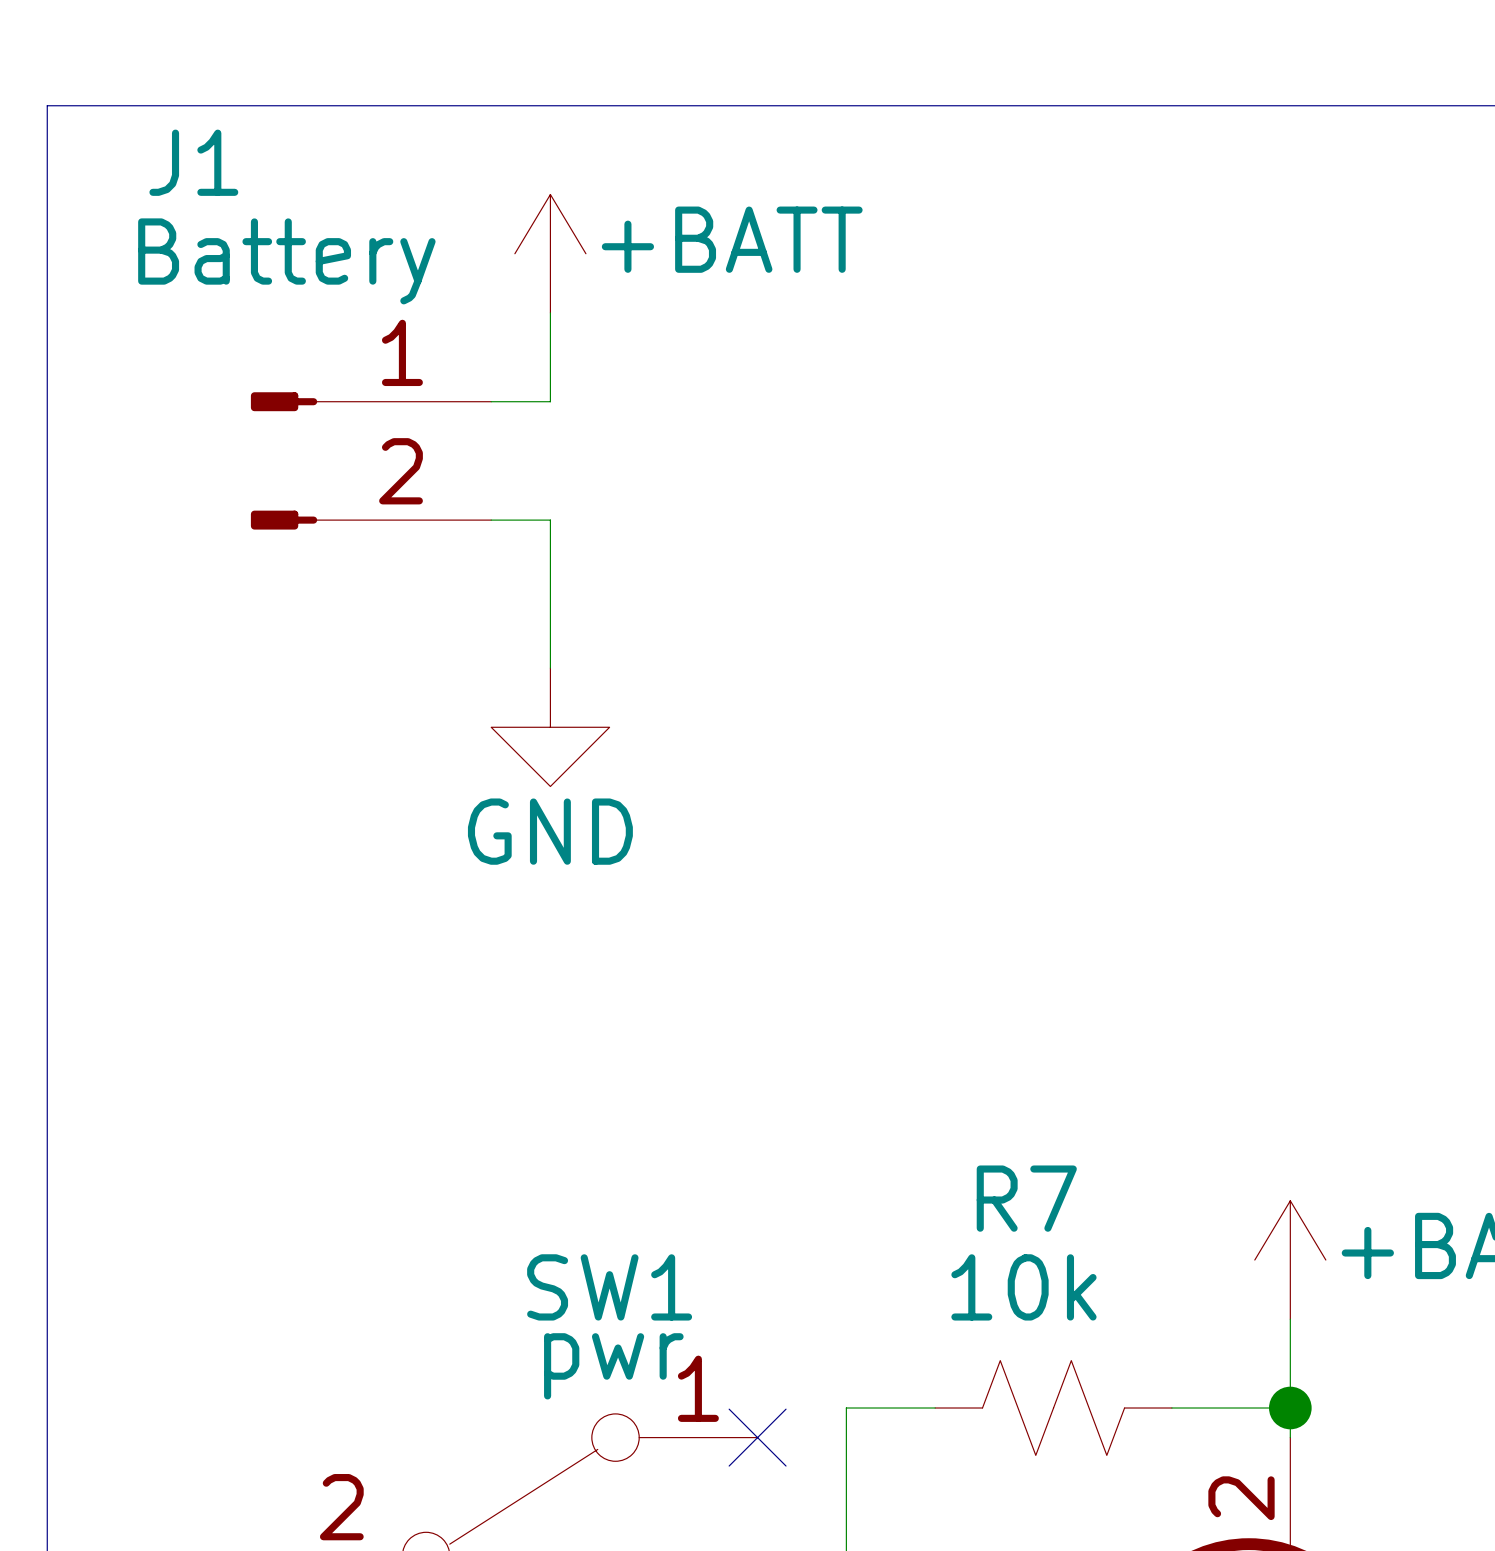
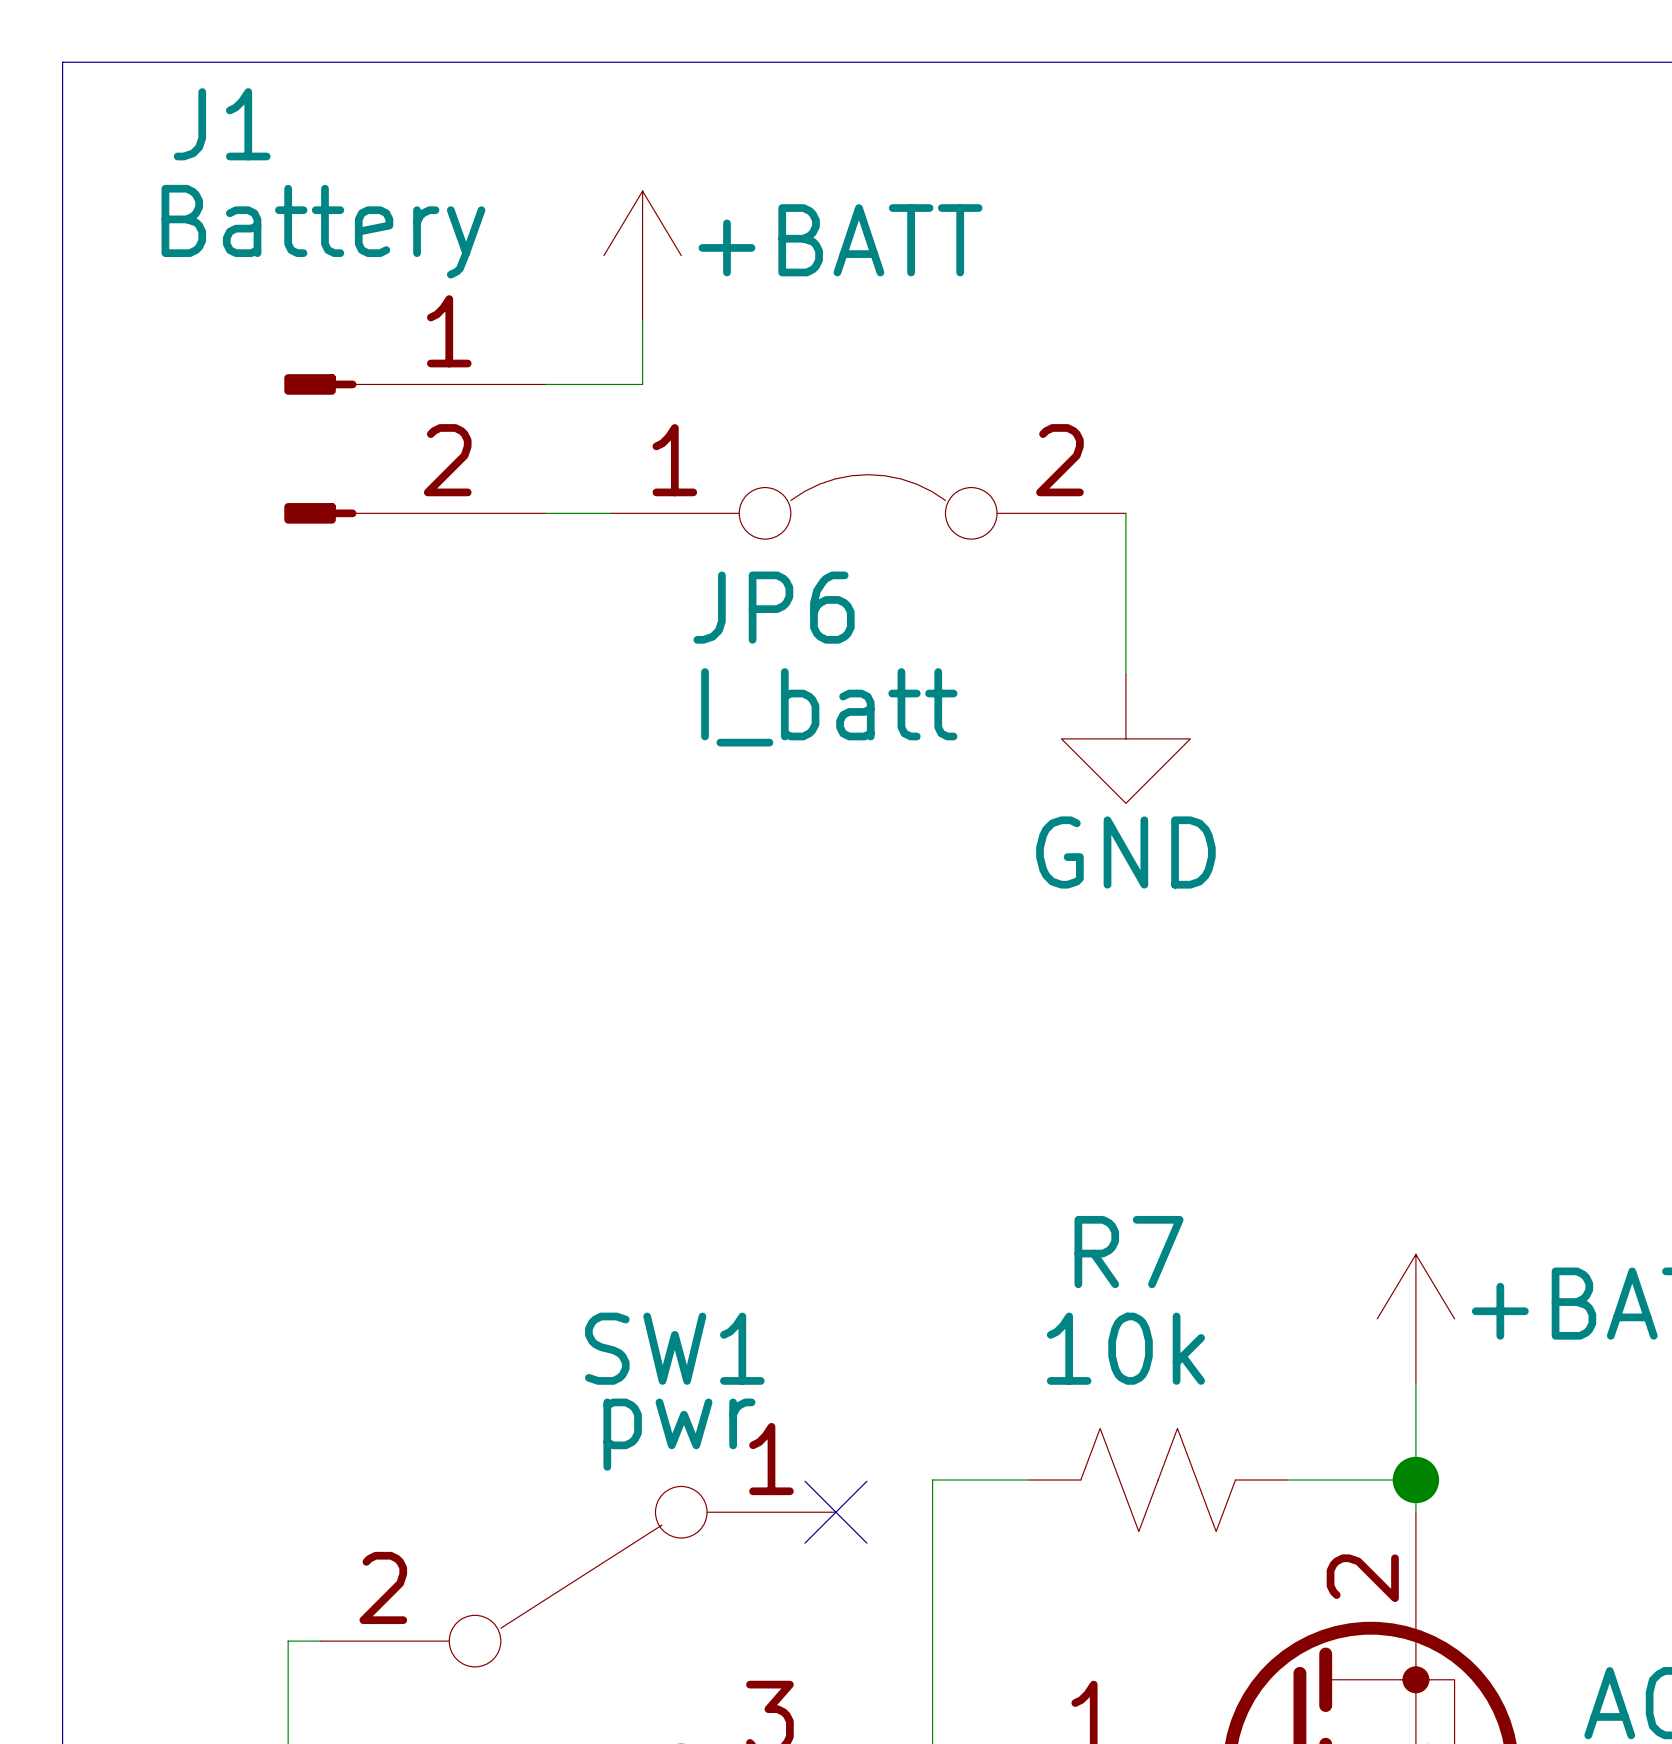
power symbol position: +BATT (550, 253) -> +BATT (642, 255)
wire: (550, 312) (550, 401) -> (642, 320) (642, 384) (610, 384)
JP6: none -> I_batt (868, 506)
wire: (550, 520) (550, 668) -> (1125, 513) (1125, 674)
power symbol position: GND (550, 727) -> GND (1125, 738)

